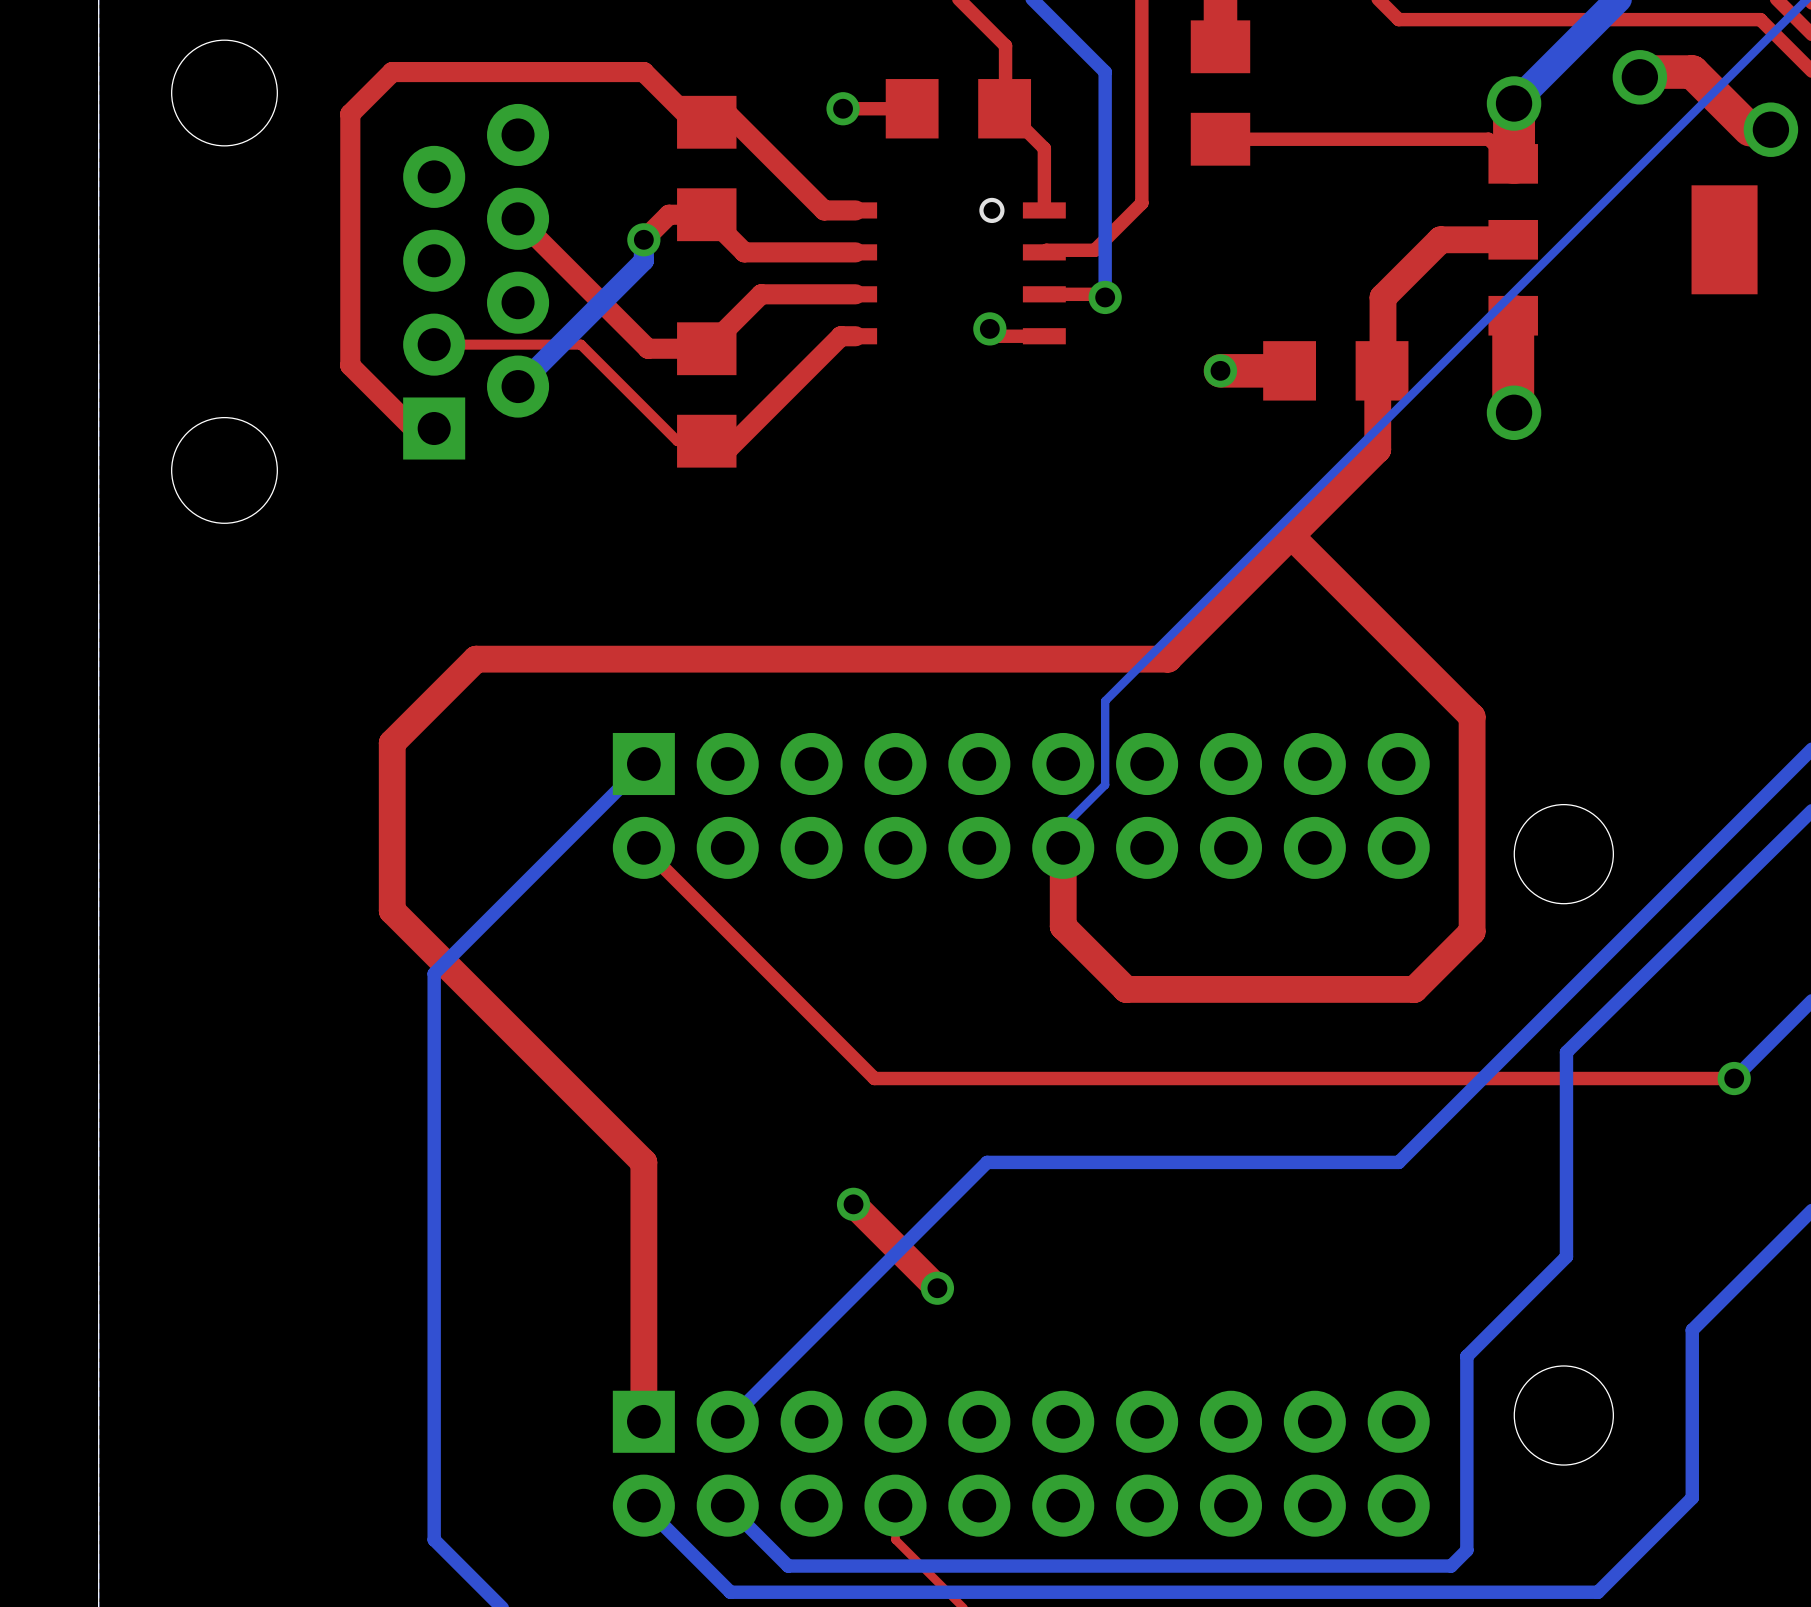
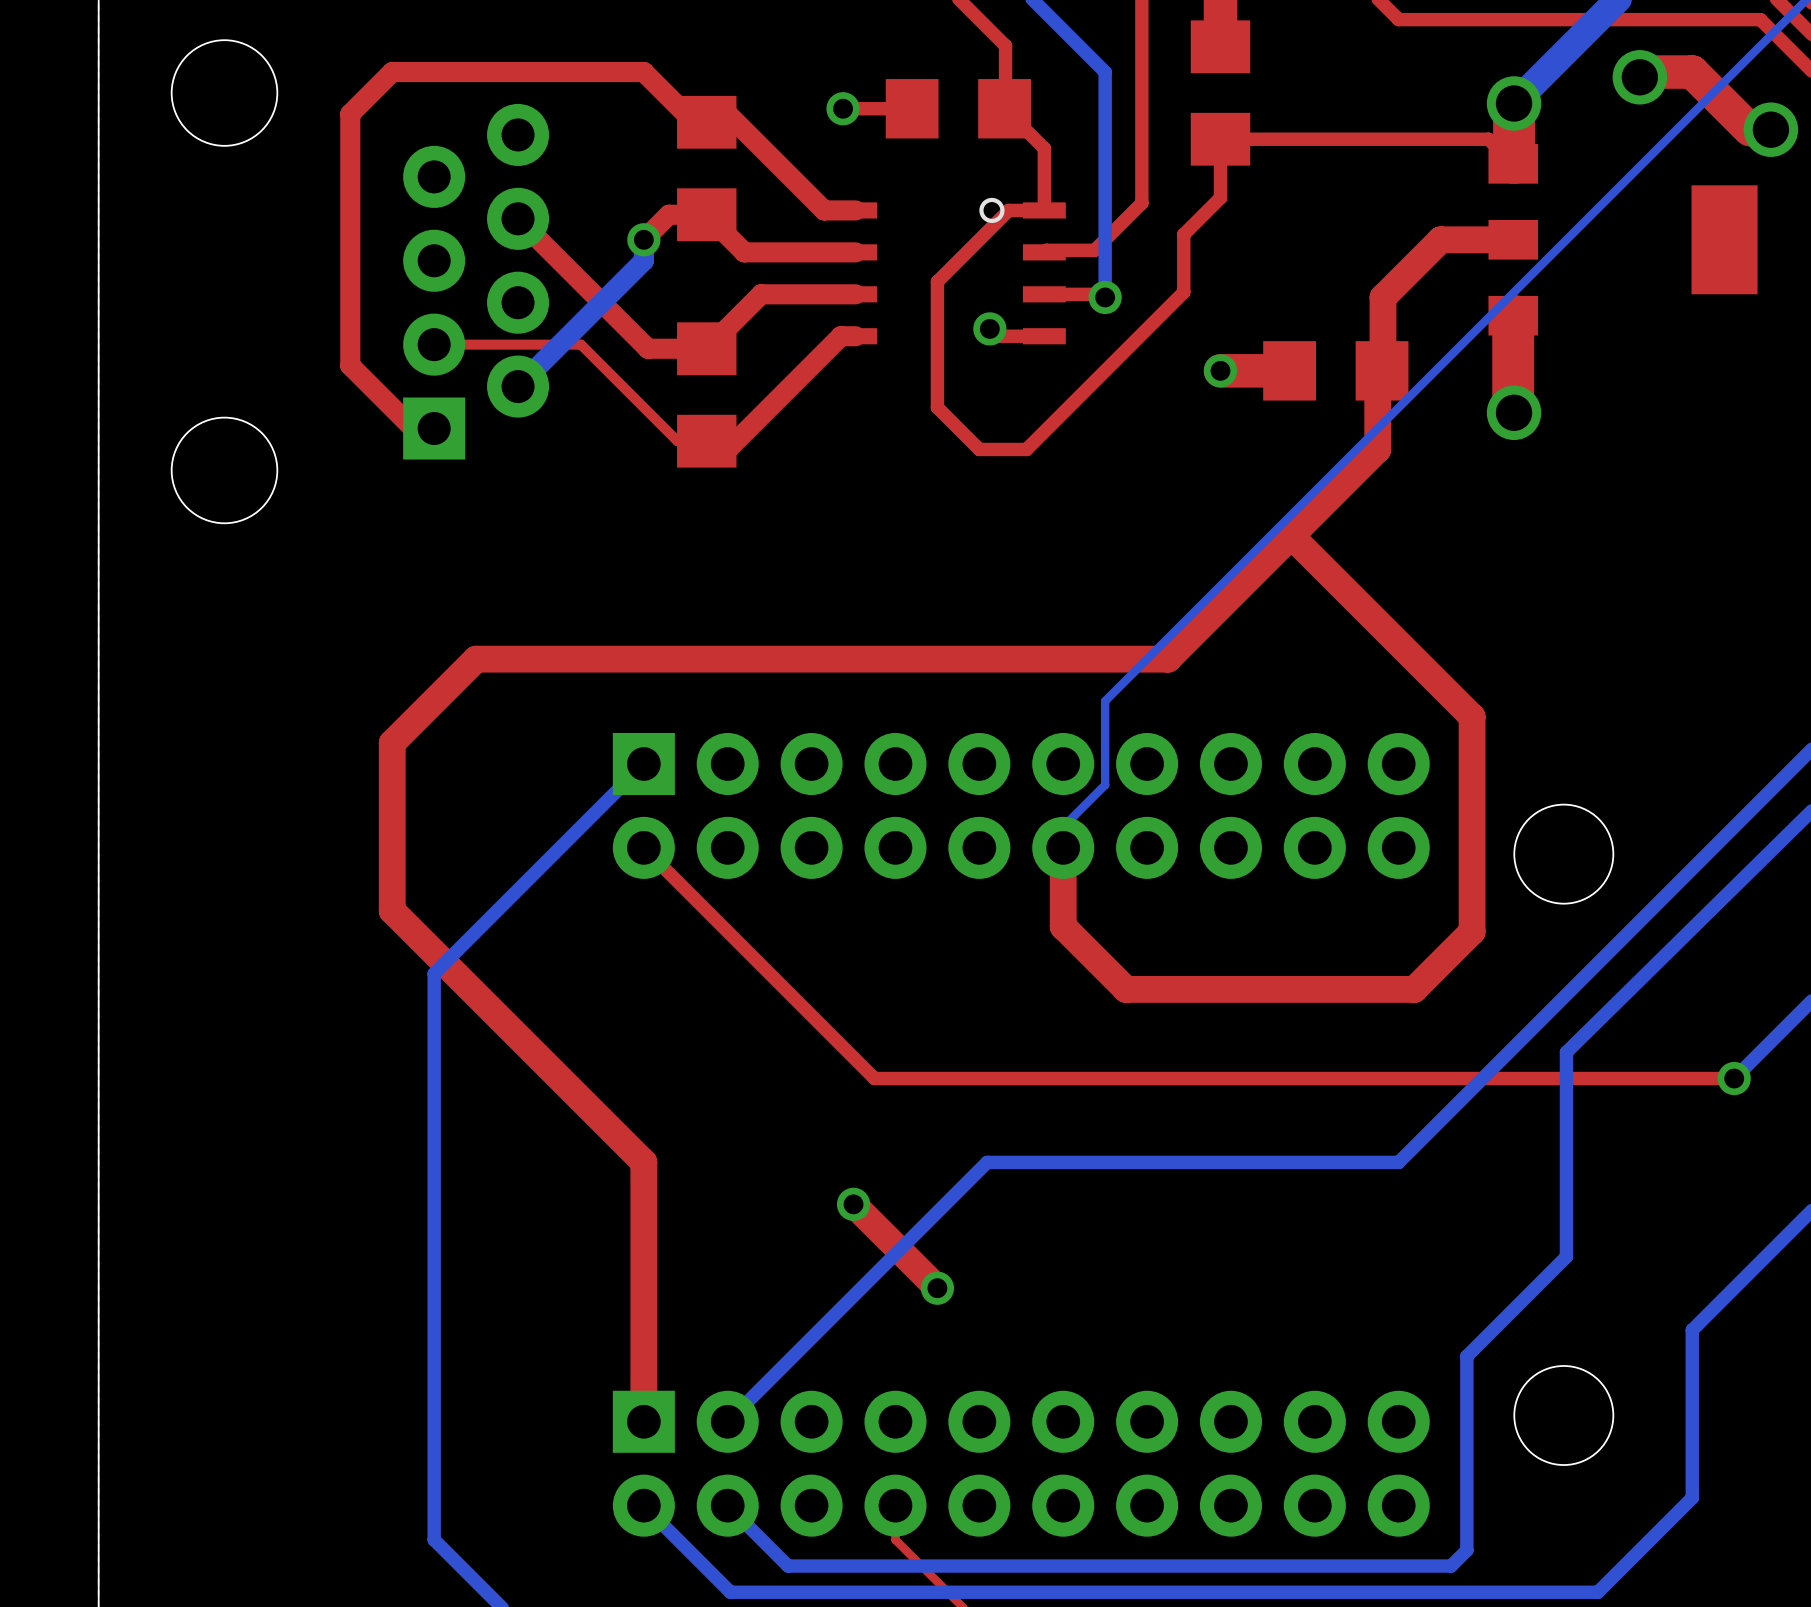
top track: none -> (1220, 139) (1220, 197) (1183, 234) (1183, 292) (1026, 449) (979, 449) (937, 407) (937, 281) (1008, 210) (1044, 210)

